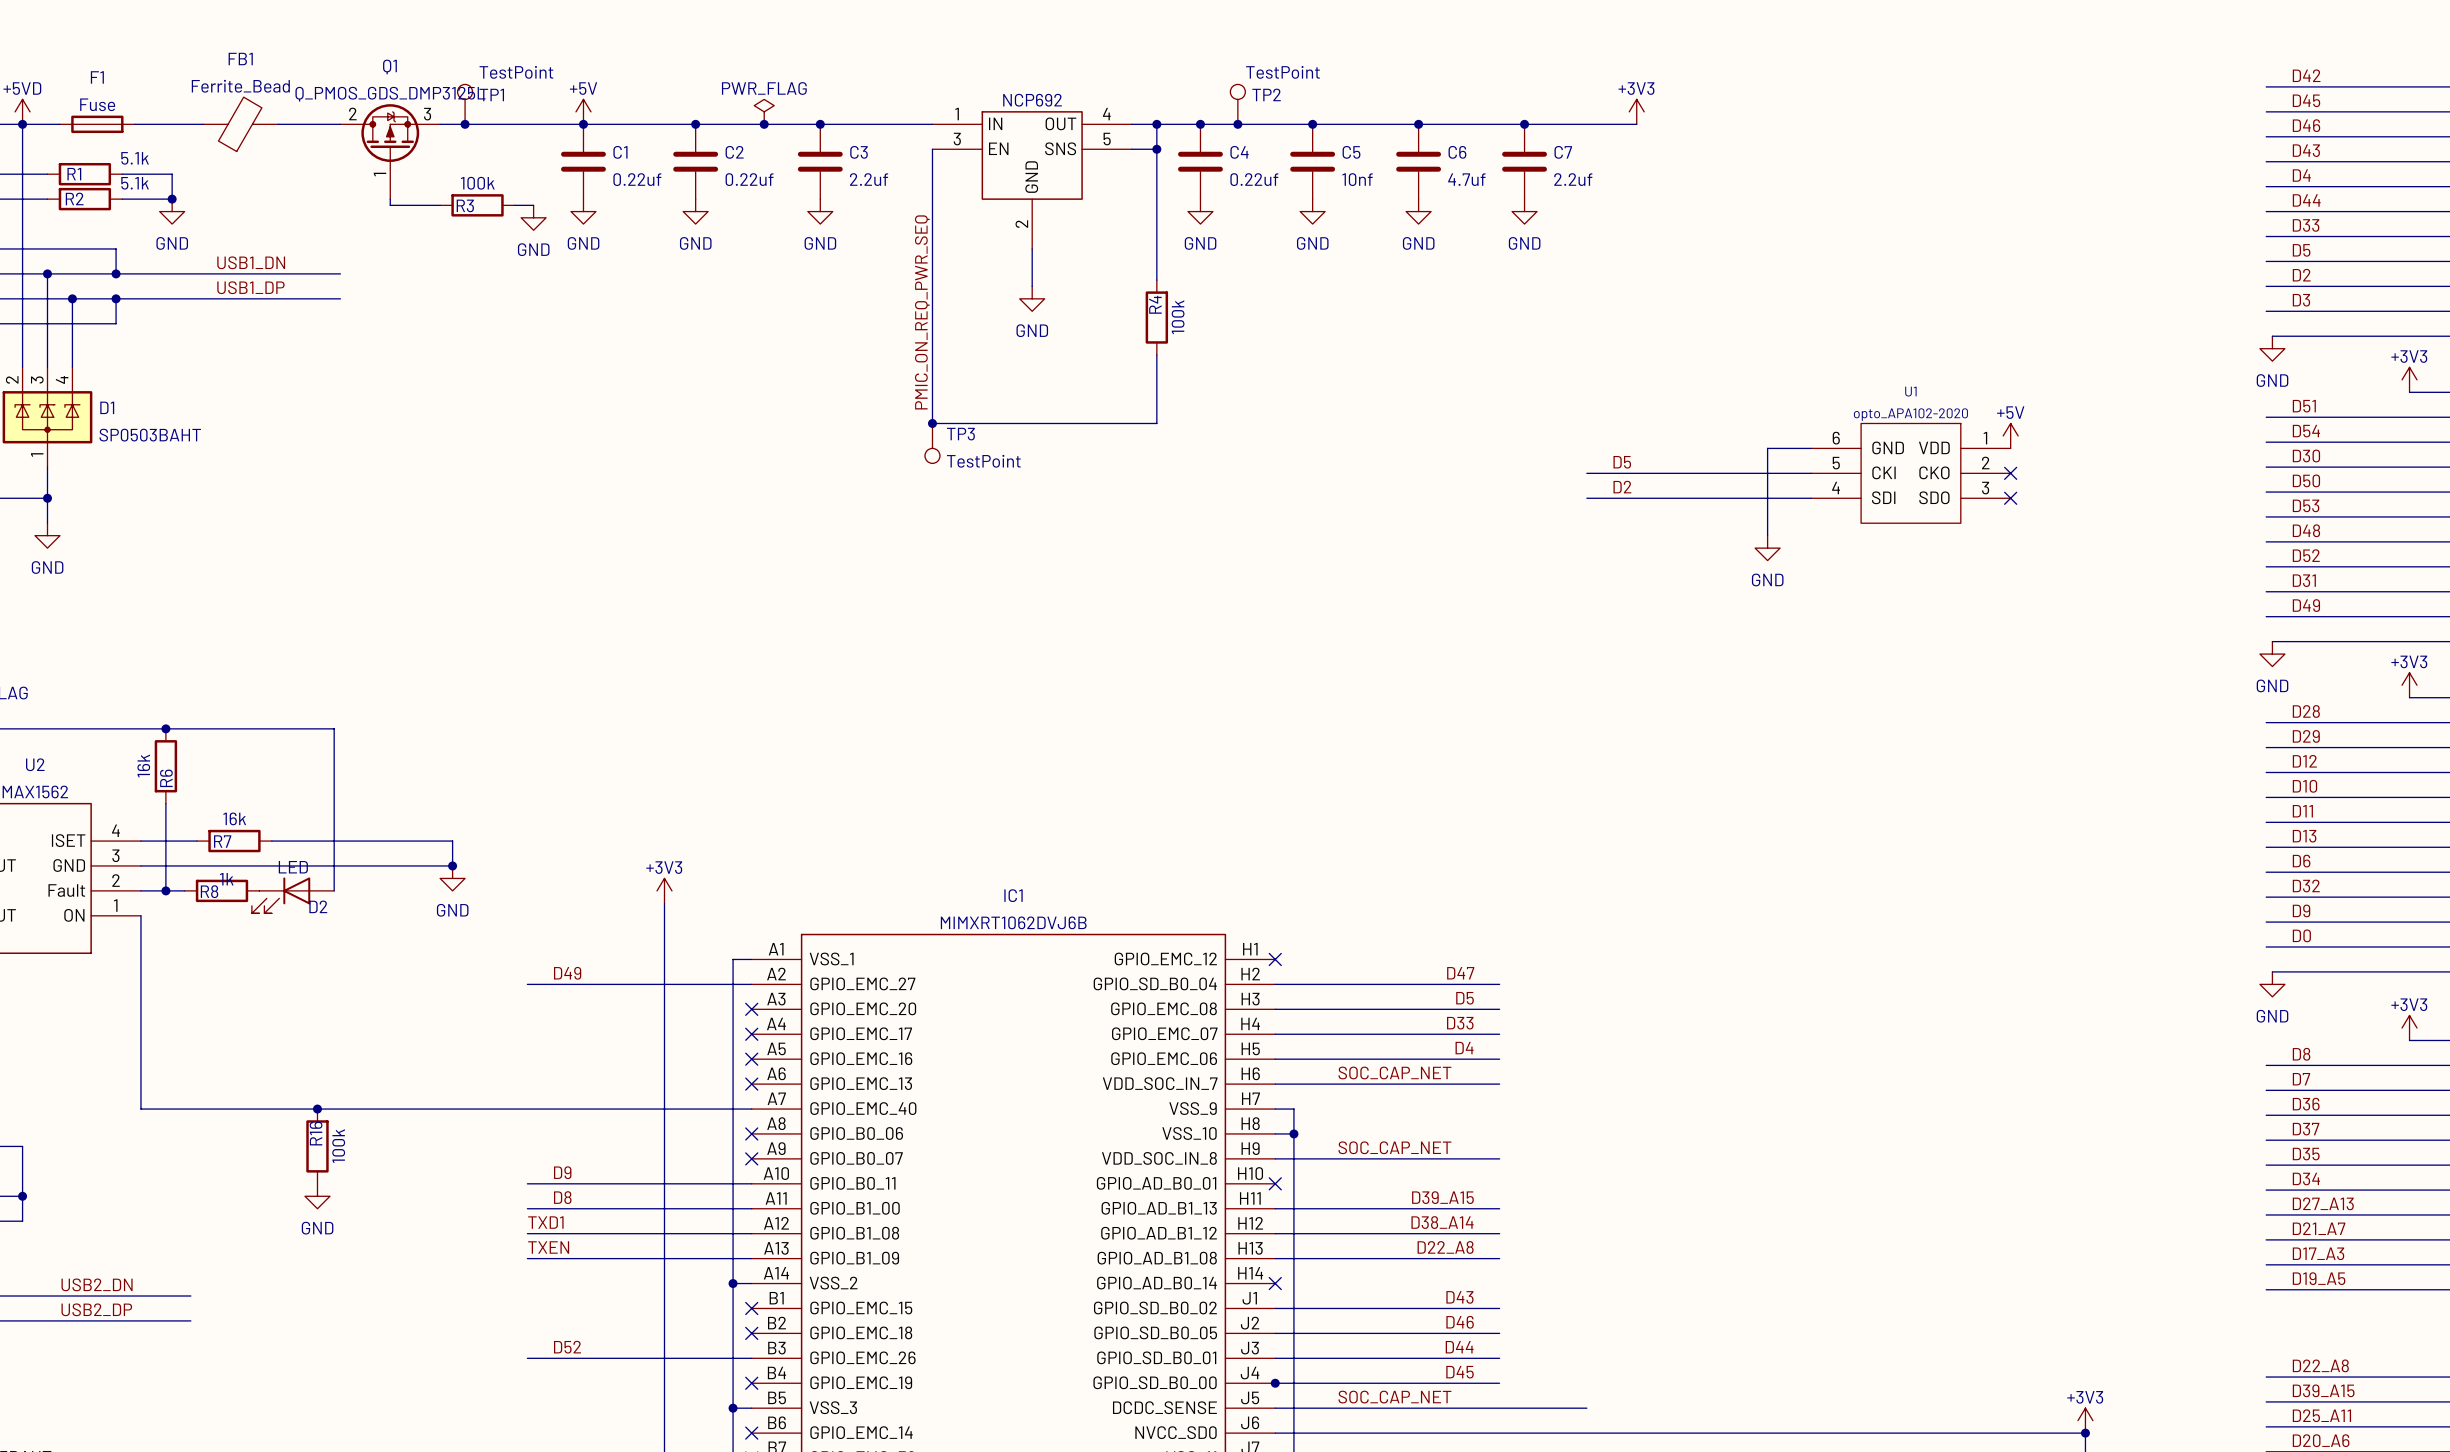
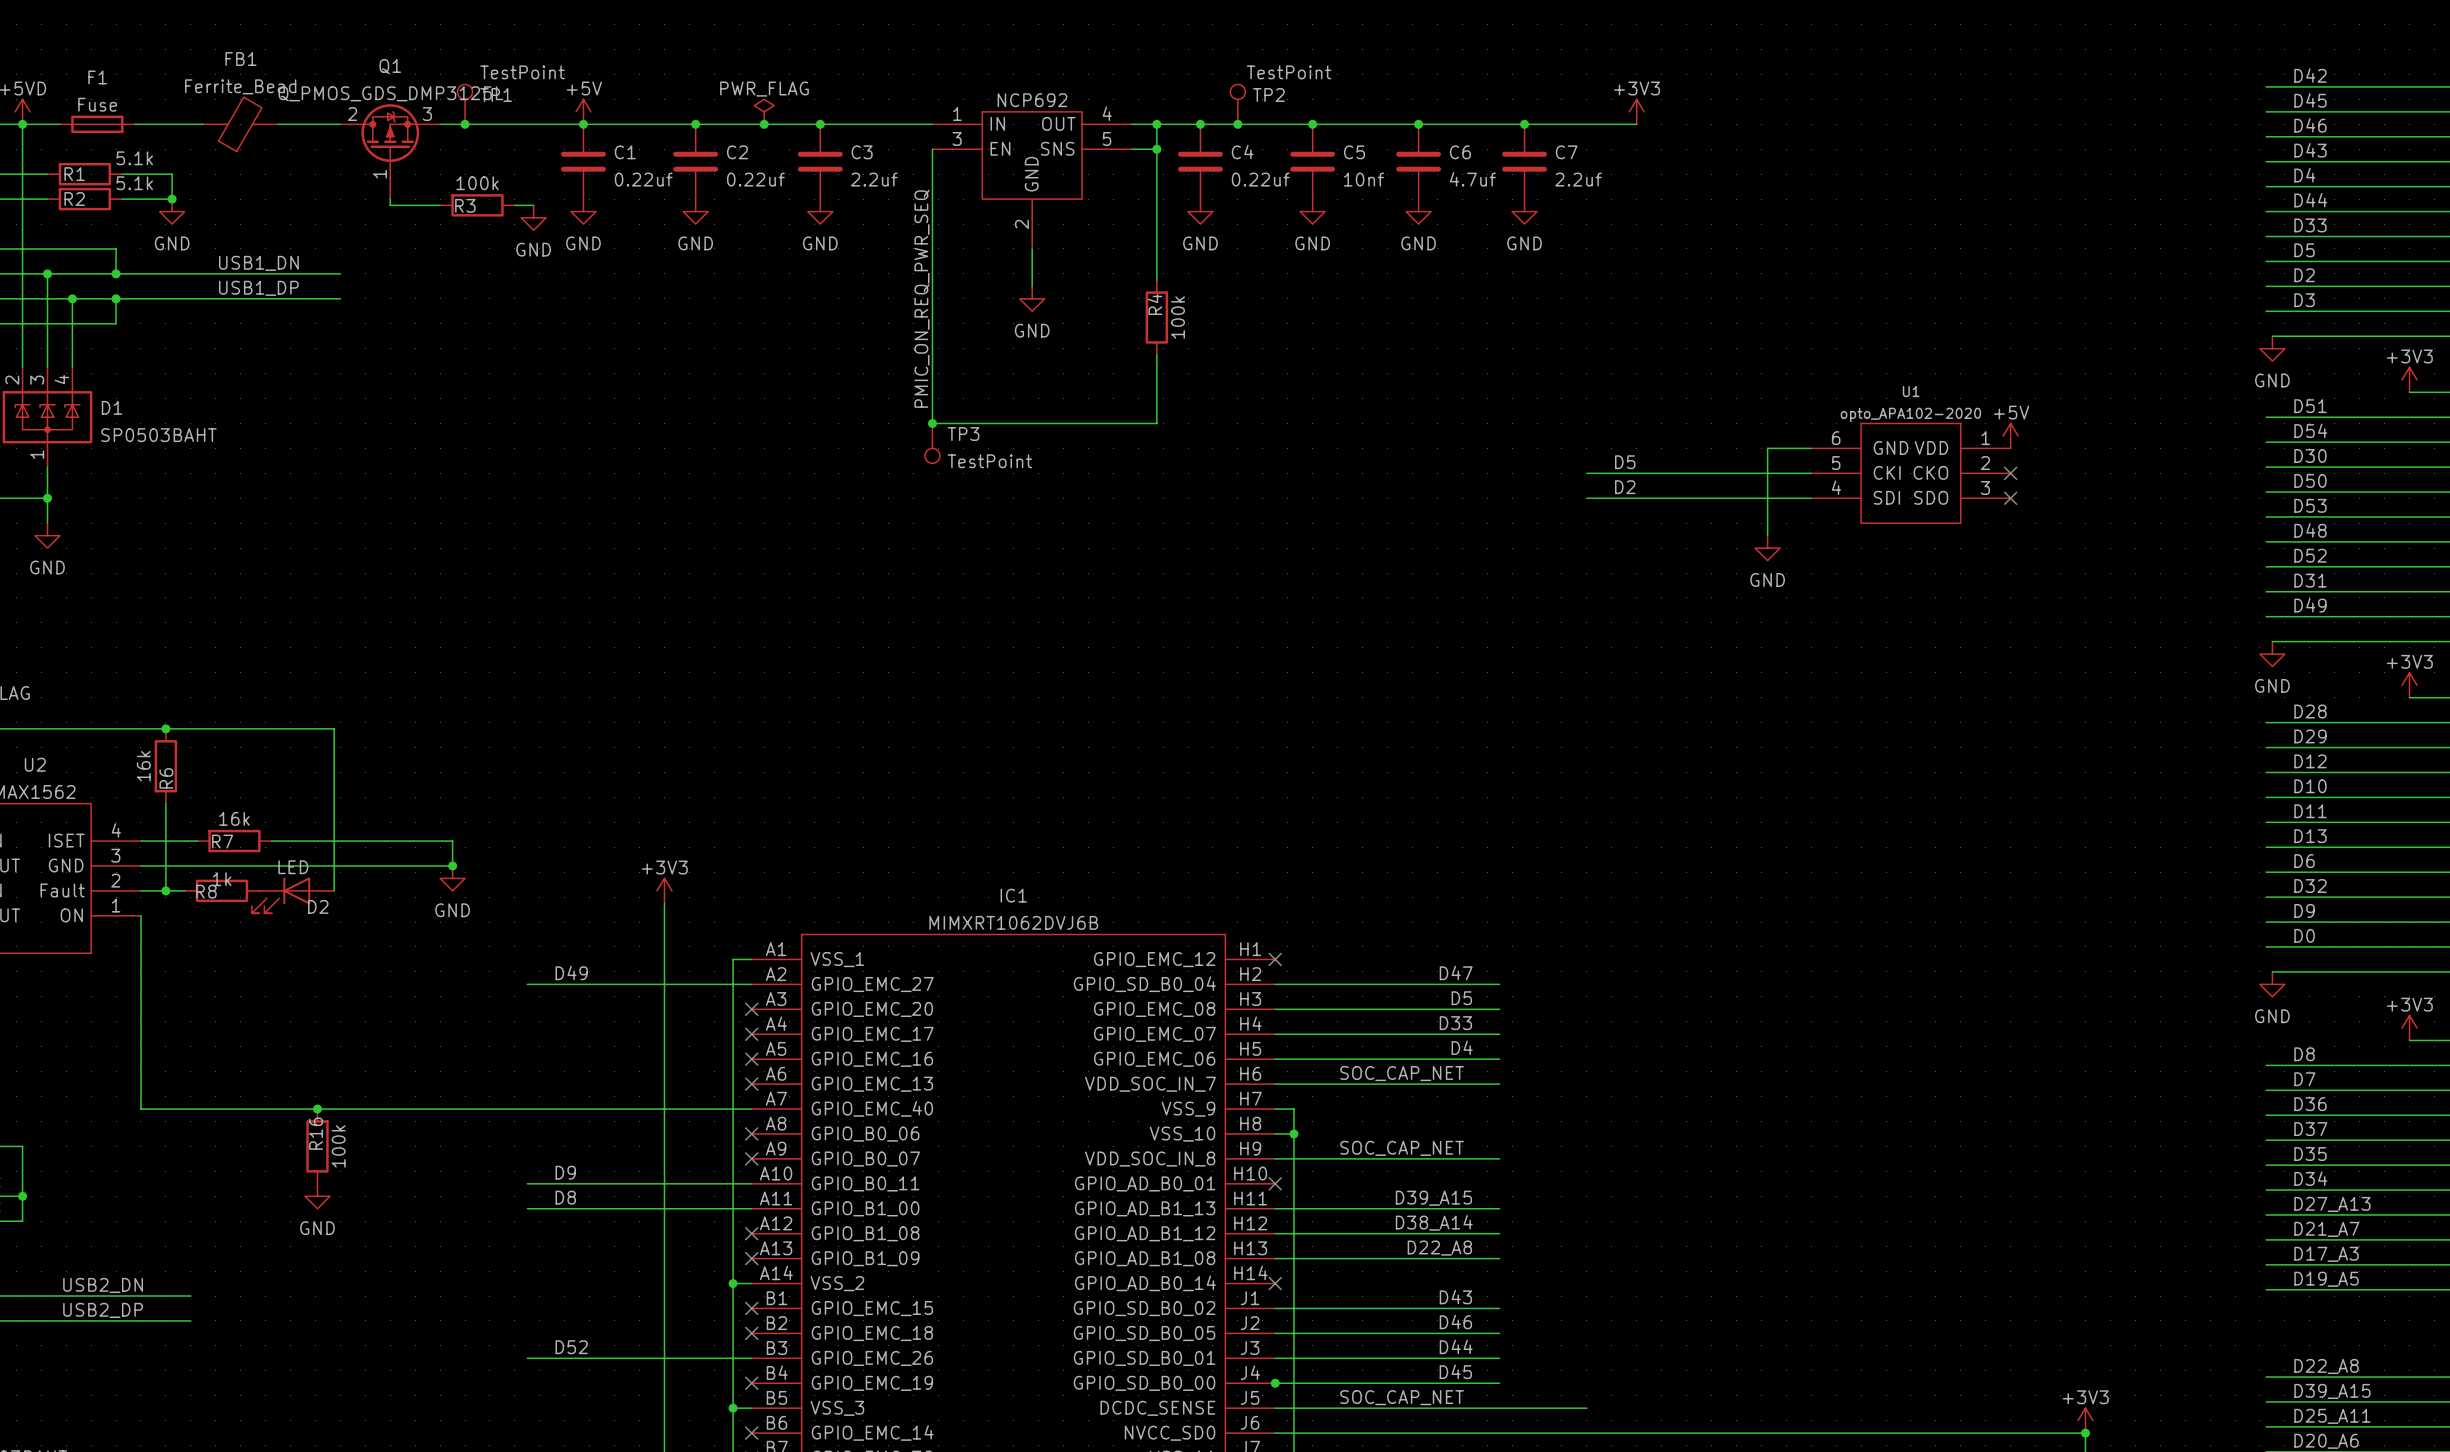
label: TXD1 (545, 1222) -> none
wire: (527, 1233) (751, 1233) -> none
no-connect mark: none -> (751, 1233)
label: TXEN (548, 1247) -> none
wire: (527, 1258) (751, 1258) -> none
no-connect mark: none -> (751, 1258)

